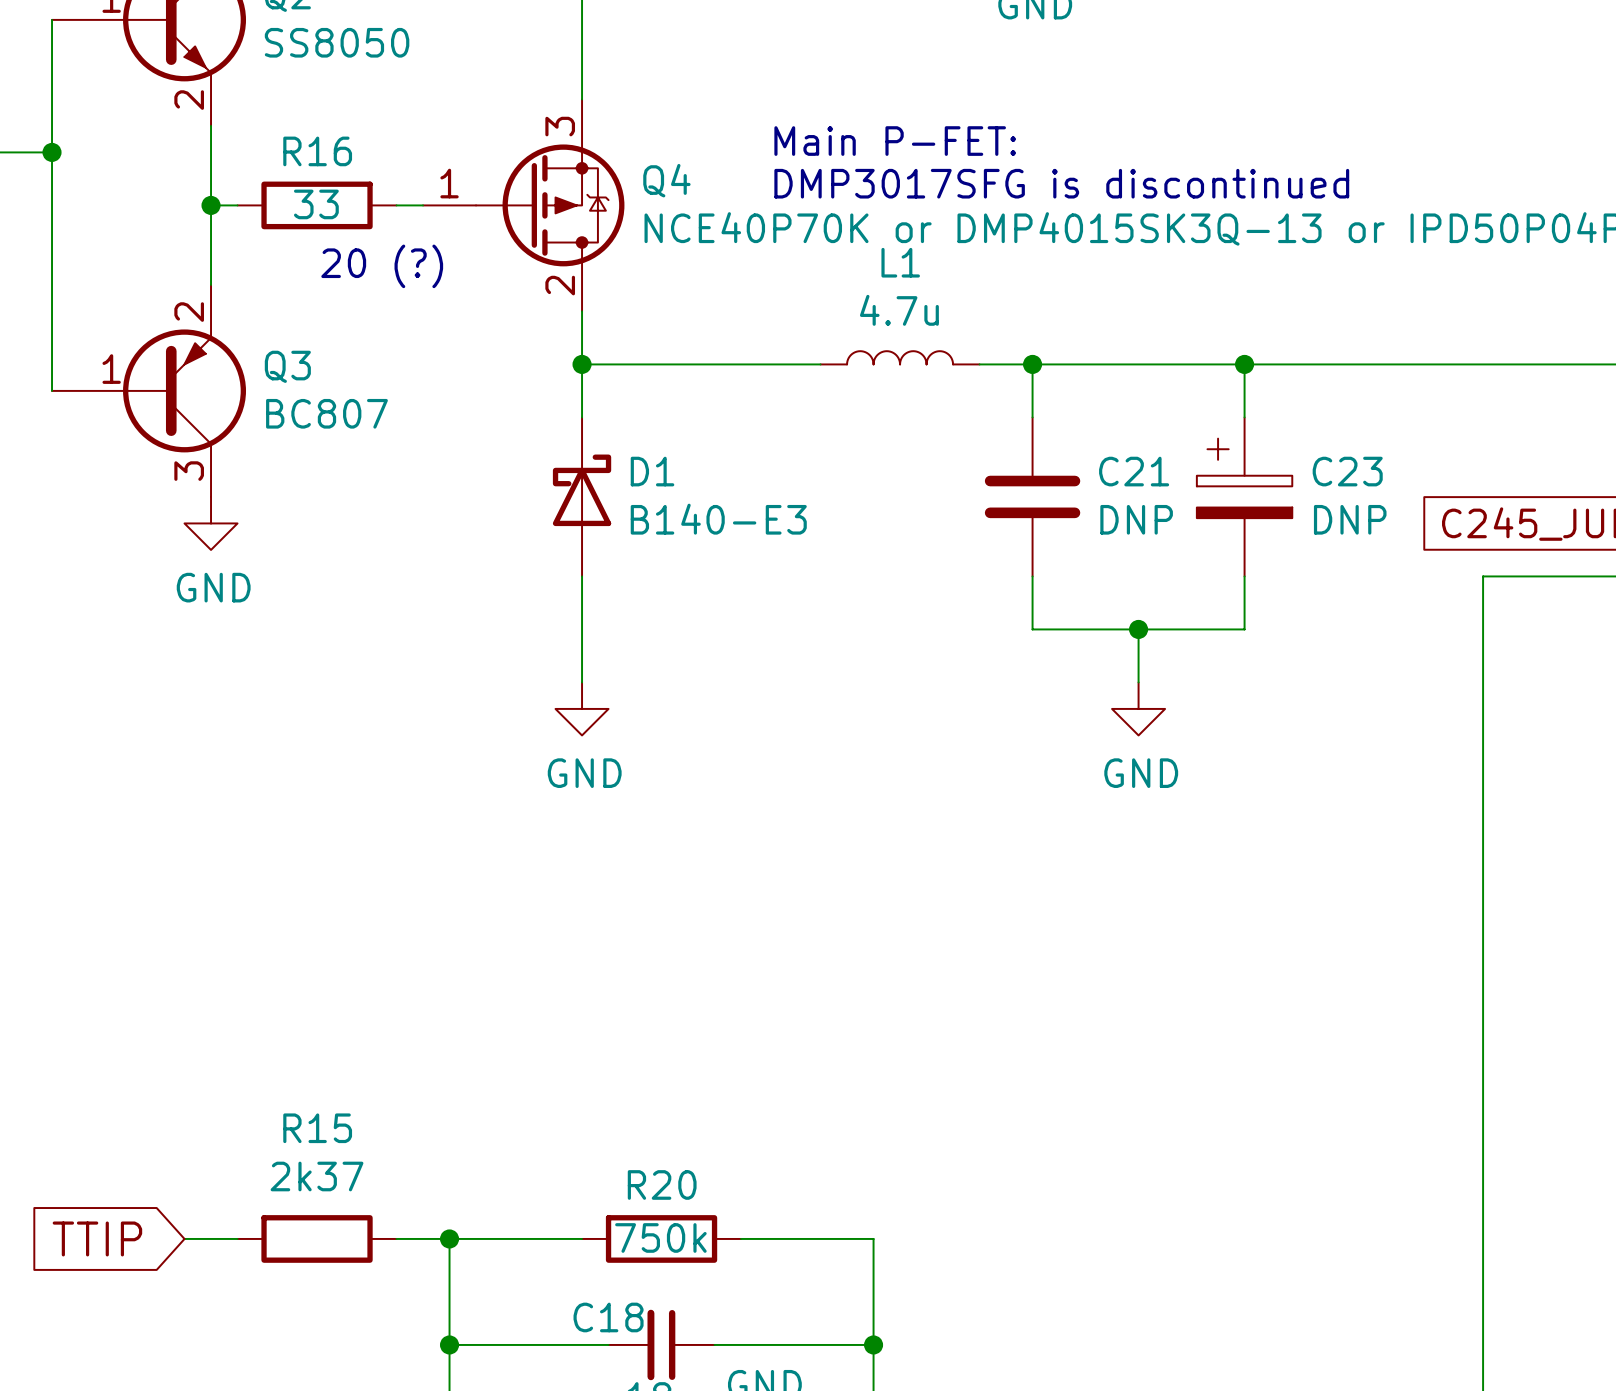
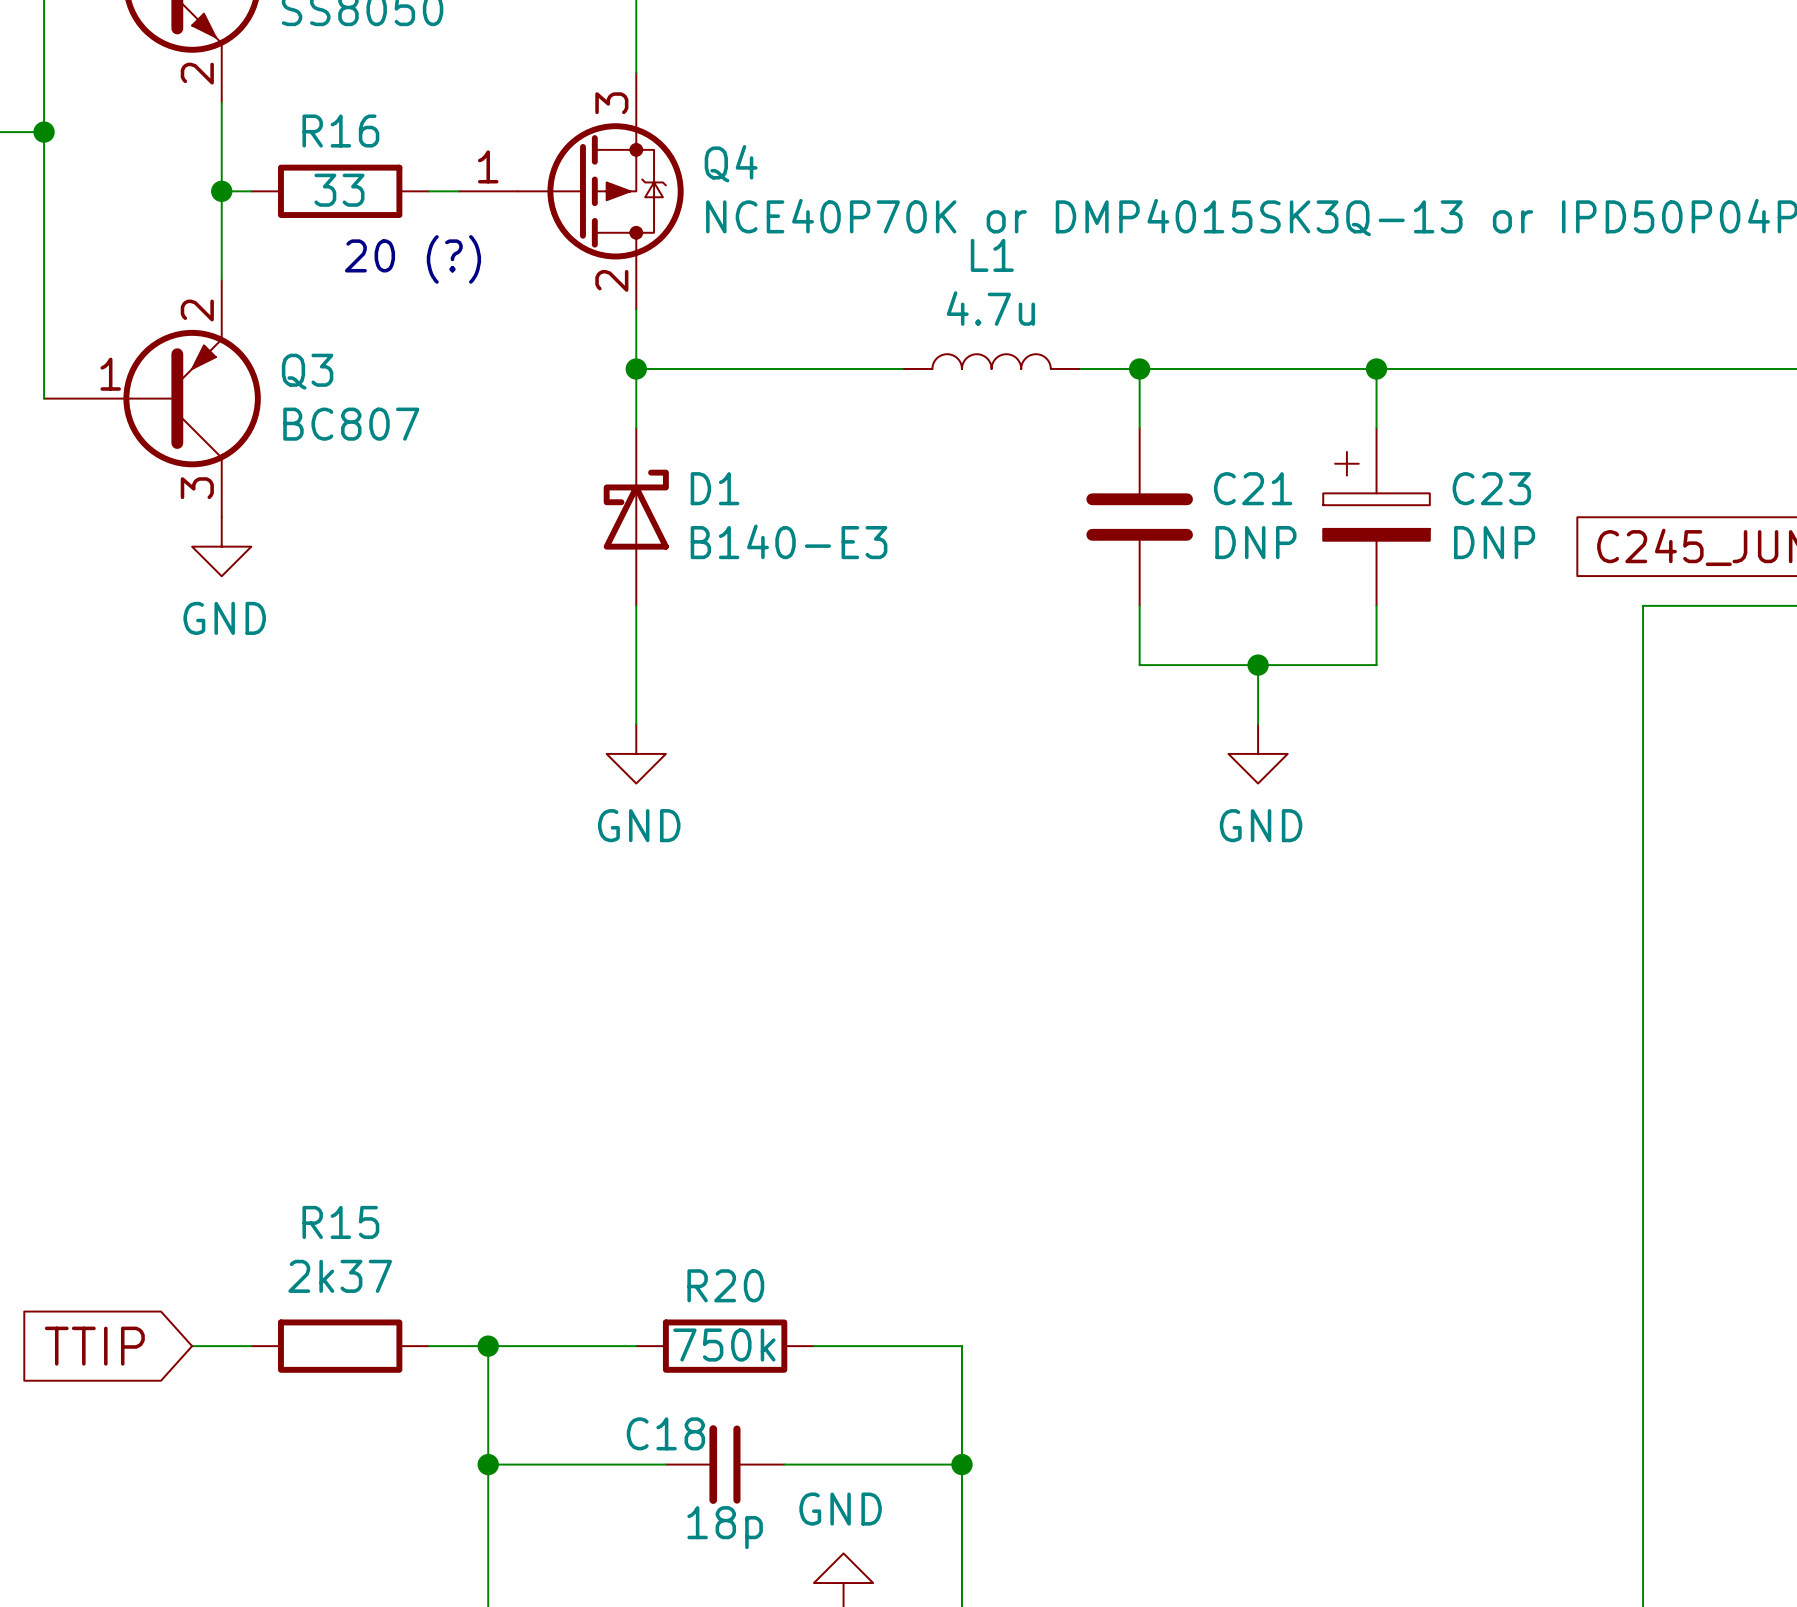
text: Main P-FET: (895, 141) -> none
text: DMP3017SFG is discontinued (1061, 183) -> none

